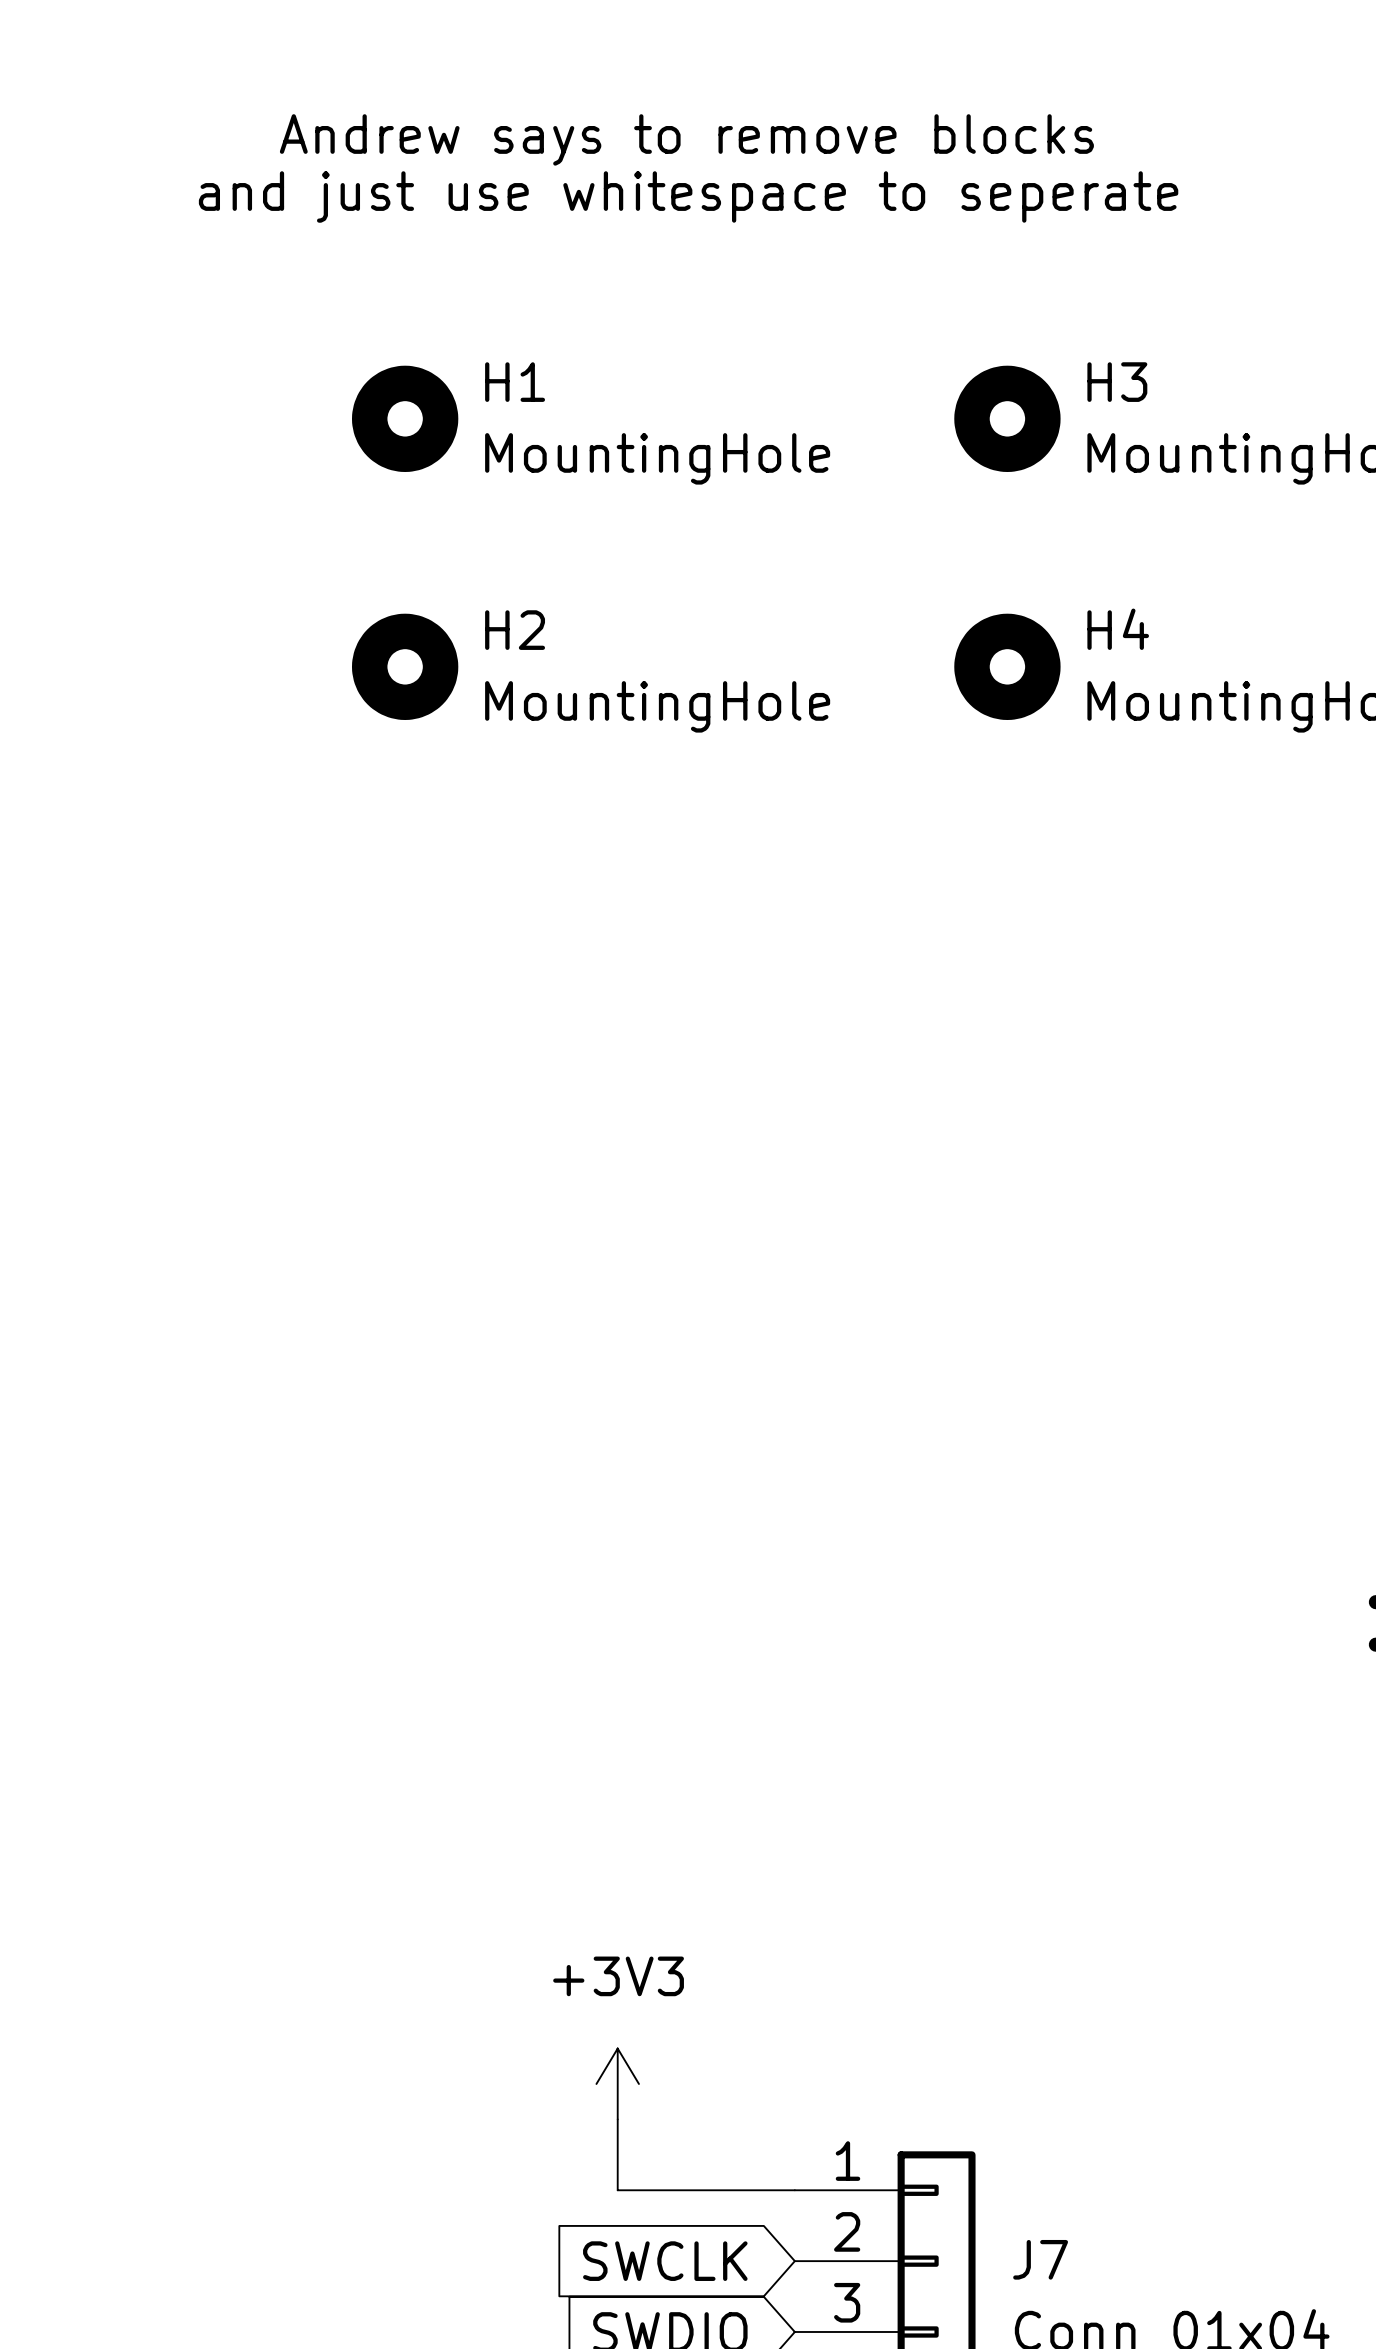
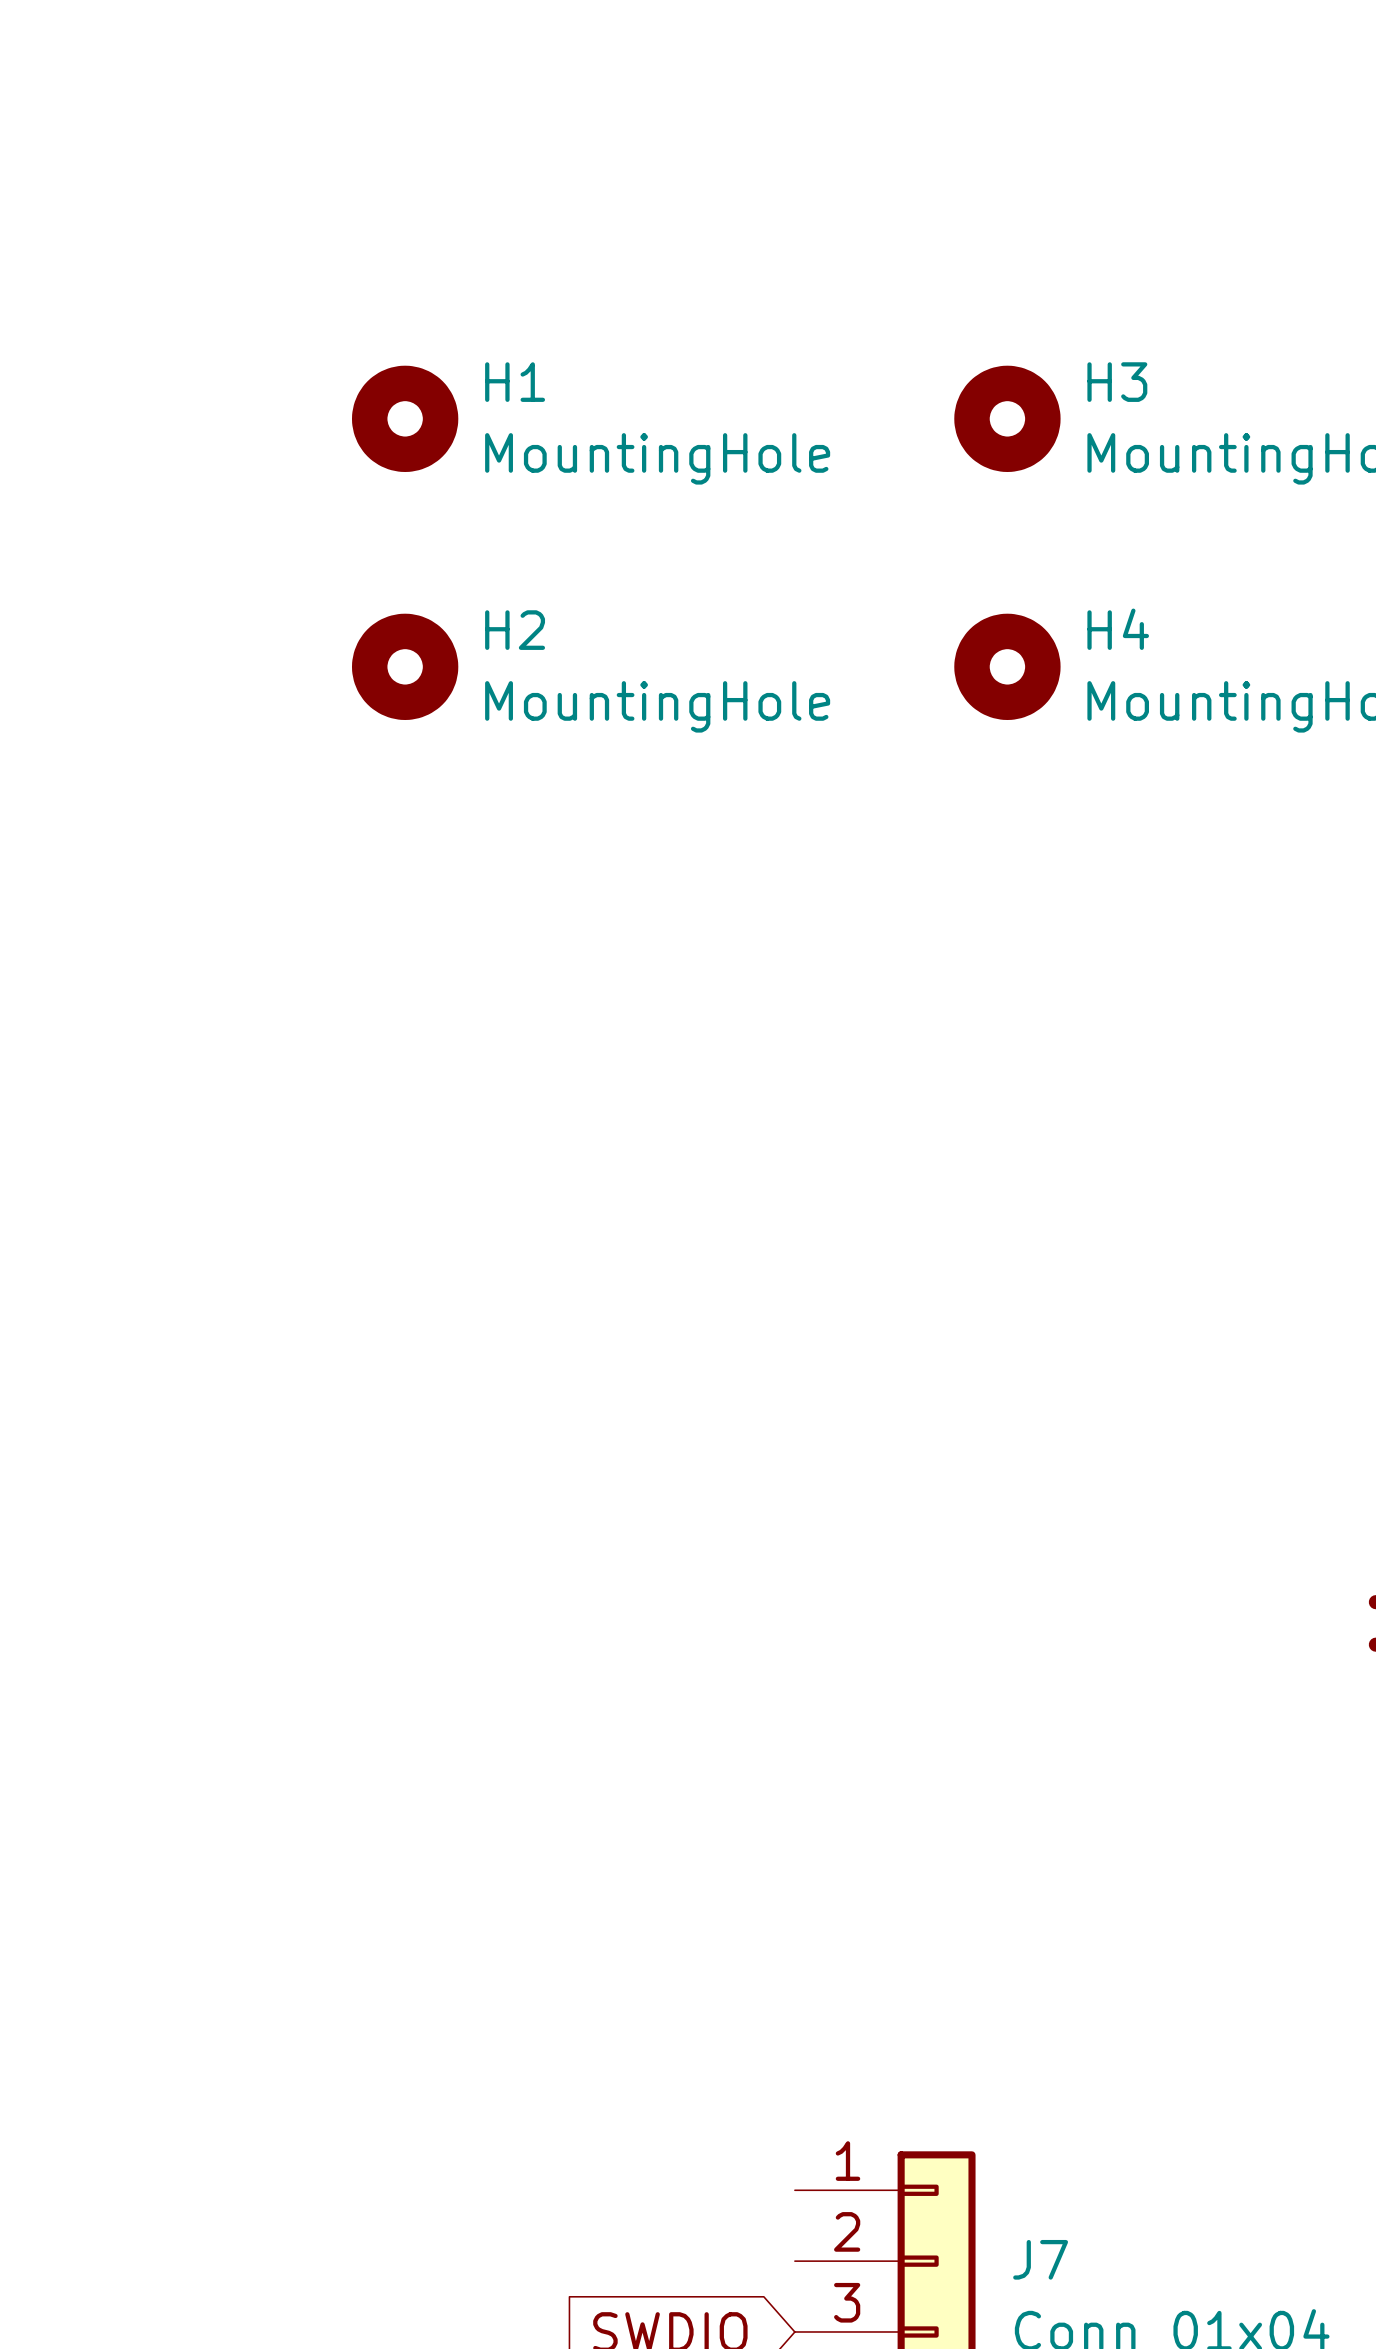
text: Andrew says to remove blocks (686, 139) -> none
text: and just use whitespace to seperate (688, 196) -> none
power symbol: +3V3 (617, 2083) -> none
wire: (617, 2119) (617, 2190) (794, 2190) -> none
global label: SWCLK (665, 2261) -> none

